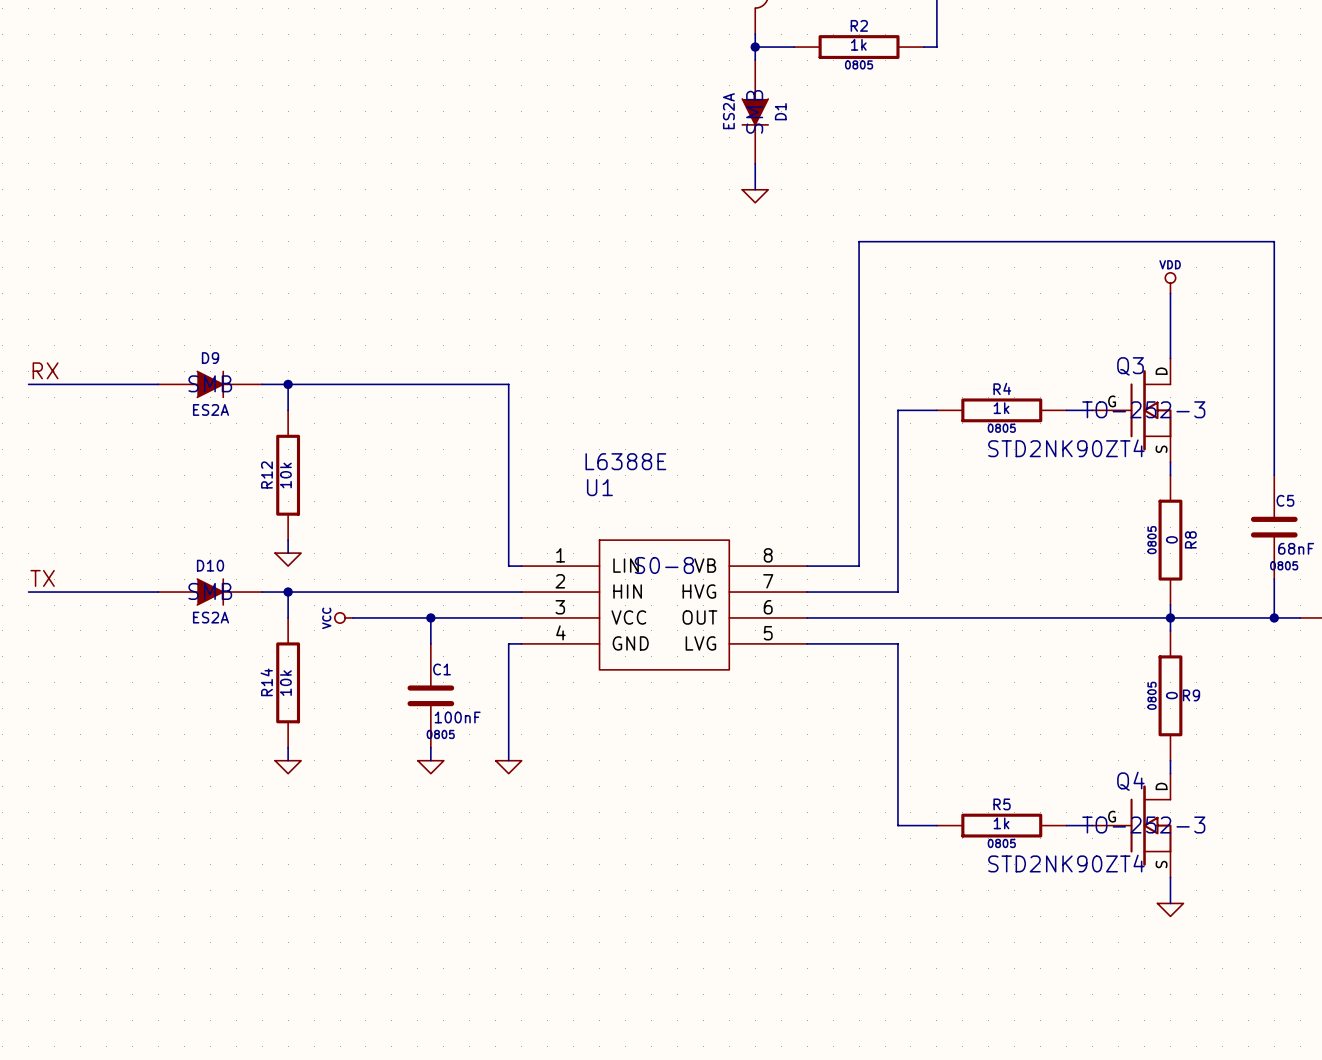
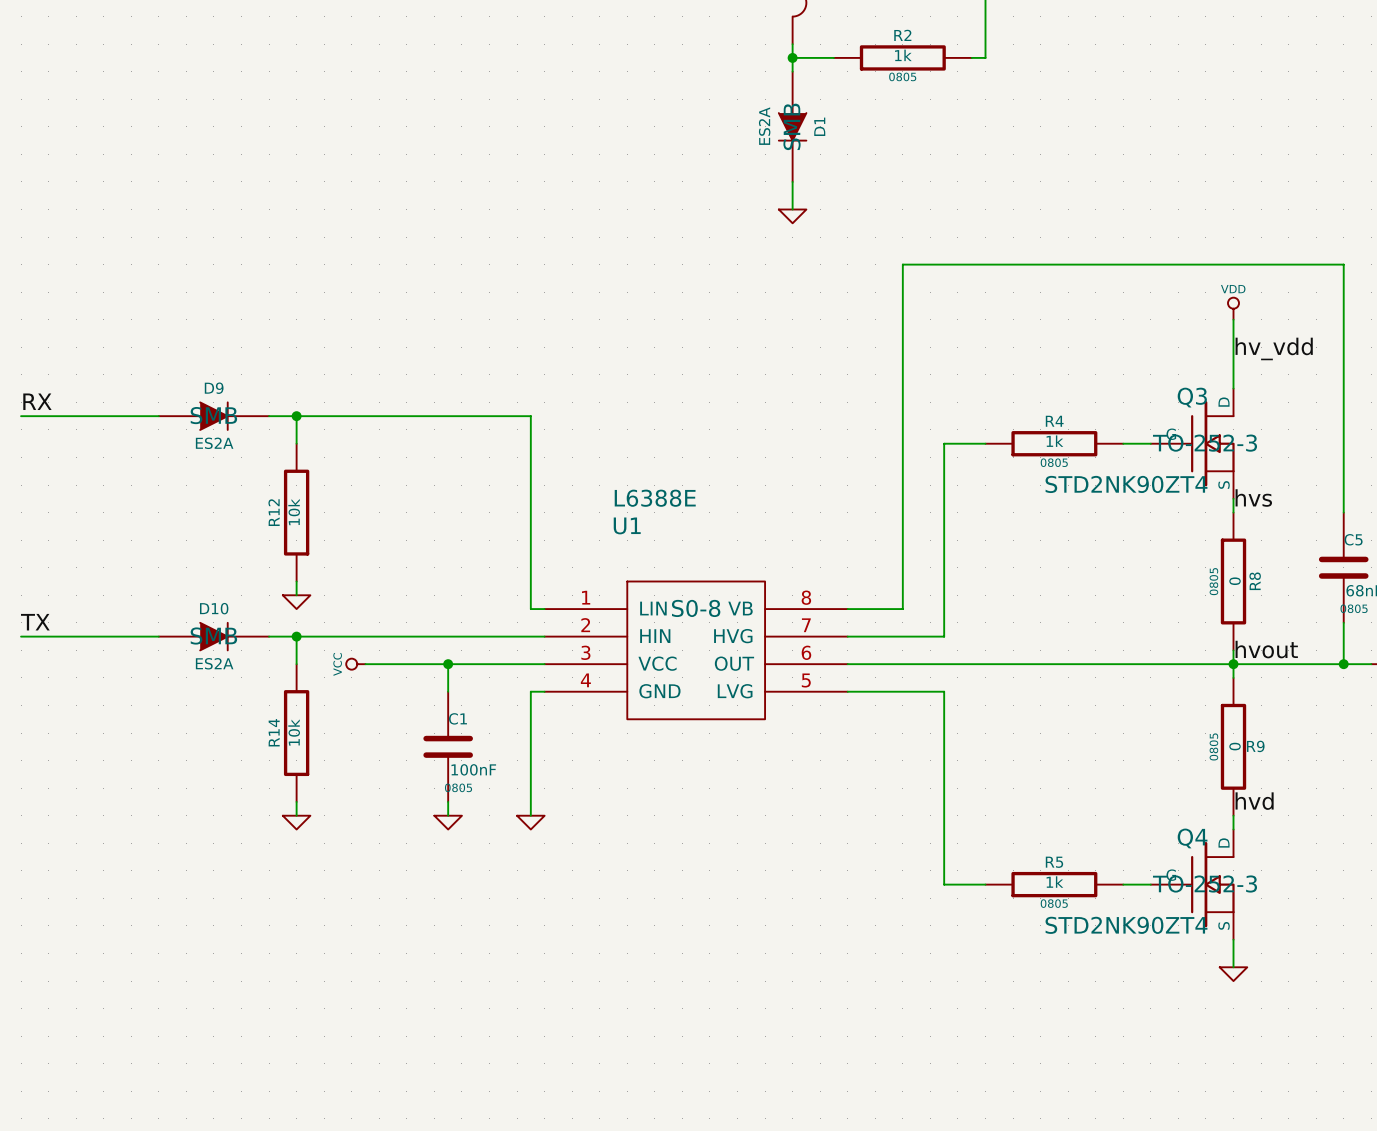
label: none -> hv_vdd (1274, 348)
label: none -> hvs (1253, 498)
label: none -> hvout (1266, 649)
label: none -> hvd (1254, 801)

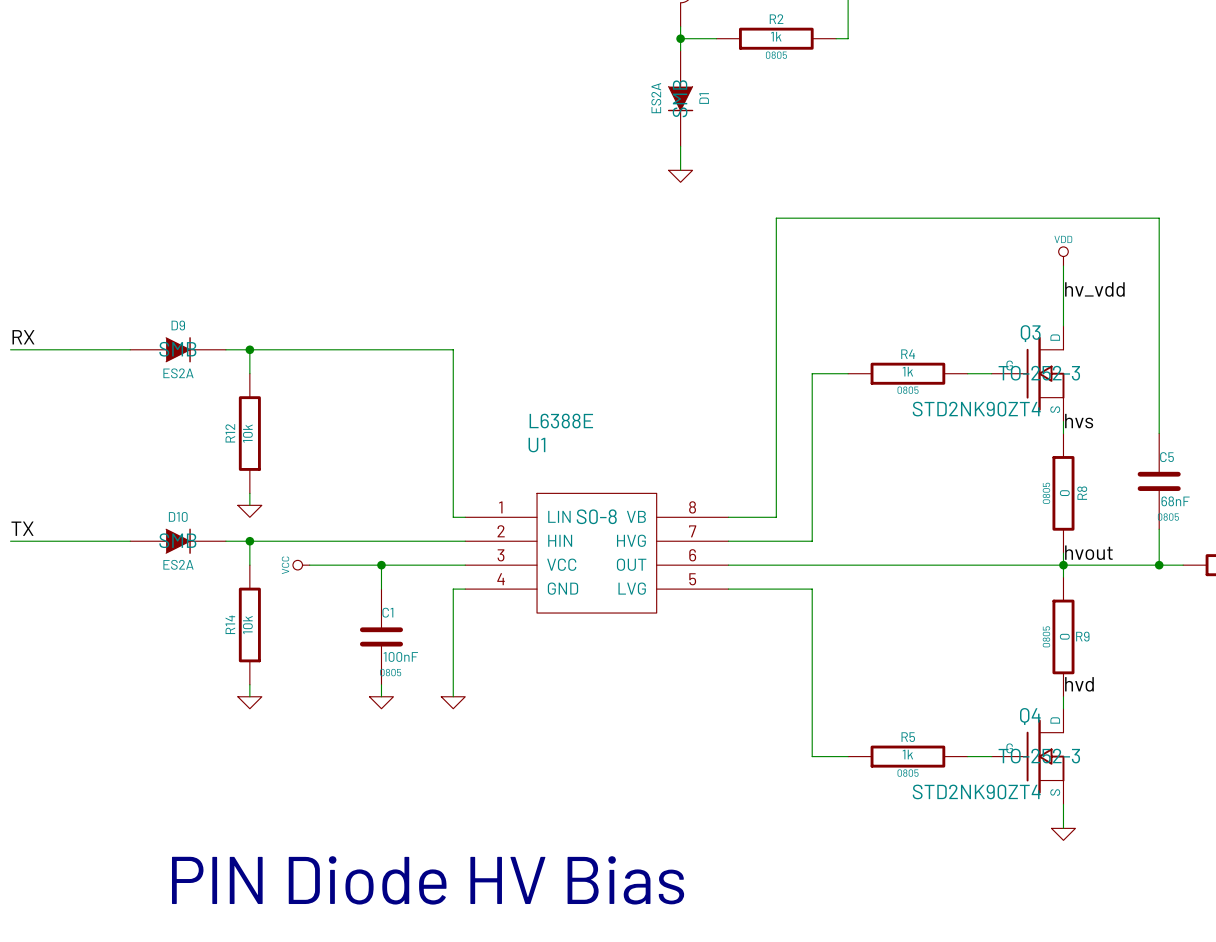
text: none -> PIN Diode HV Bias (428, 880)

